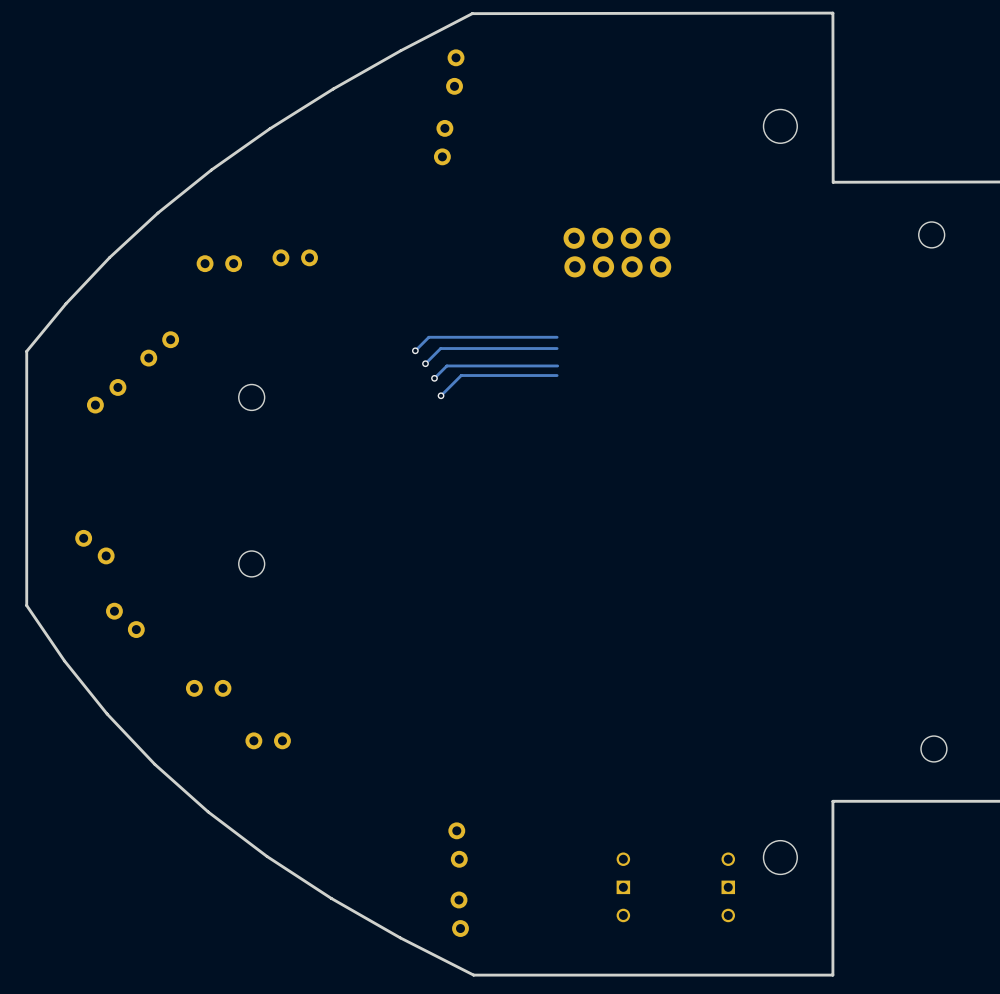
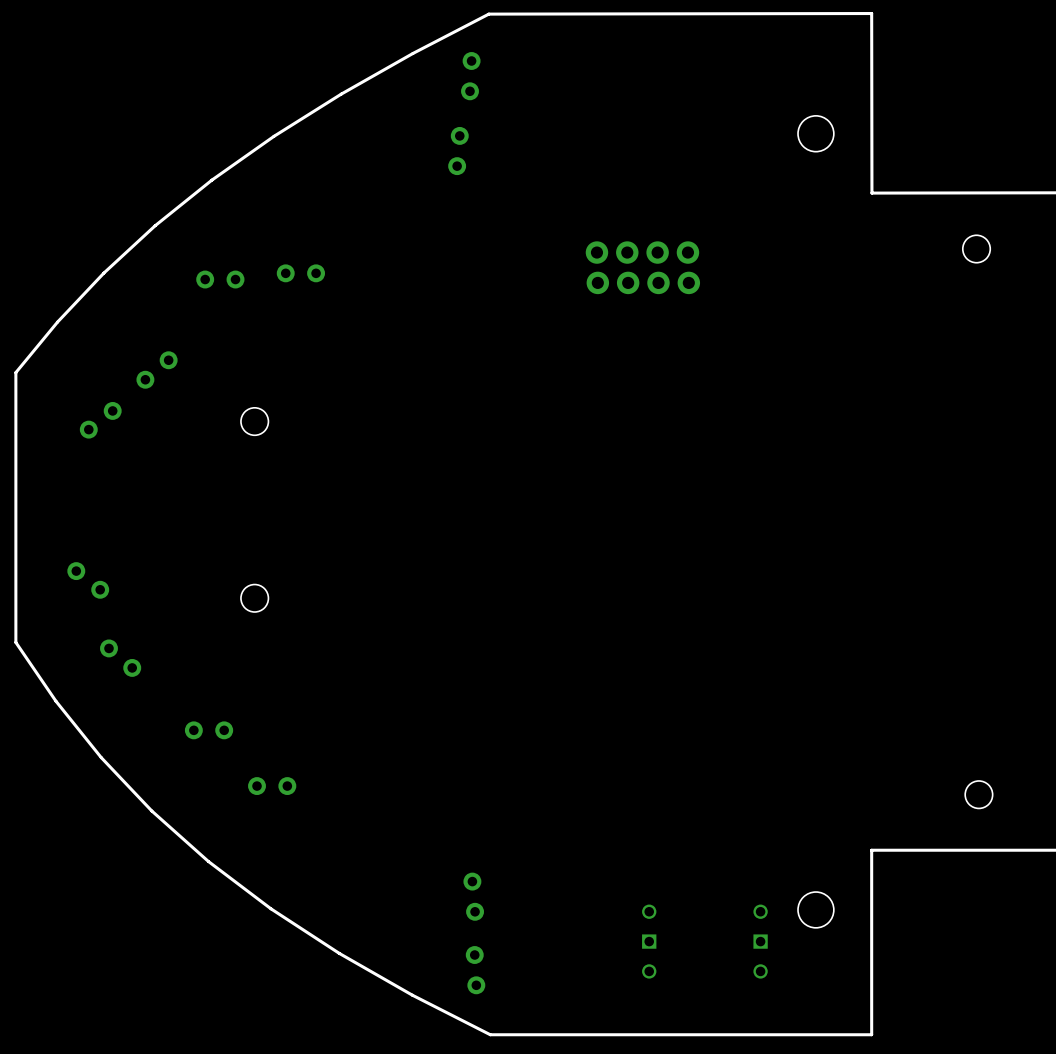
track: (557, 337) (428, 337) (415, 350) -> none
track: (557, 348) (440, 348) (425, 363) -> none
via: (415, 350) -> none
via: (425, 363) -> none
track: (557, 365) (446, 365) (435, 378) -> none
track: (557, 375) (461, 375) (441, 395) -> none
via: (434, 378) -> none
via: (441, 395) -> none

